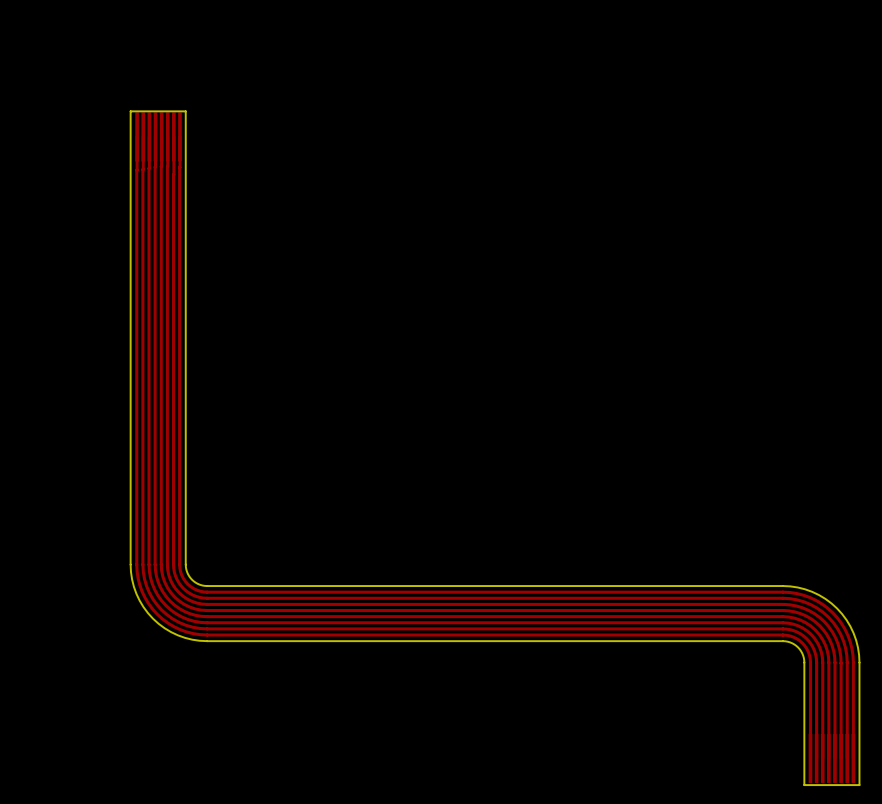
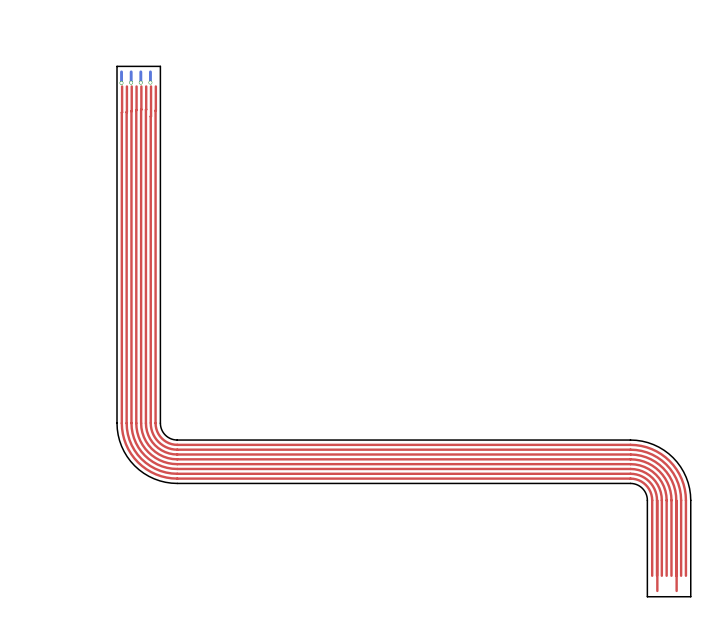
bottom track: none -> (121, 71) (121, 82)
bottom track: none -> (131, 71) (131, 82)
bottom track: none -> (140, 71) (140, 82)
bottom track: none -> (150, 71) (150, 82)
via: none -> (150, 82)
via: none -> (121, 82)
via: none -> (131, 82)
via: none -> (140, 82)
part: (158, 136) -> none
top track: none -> (657, 500) (657, 590)
top track: none -> (676, 501) (676, 590)
part: (831, 758) -> none

